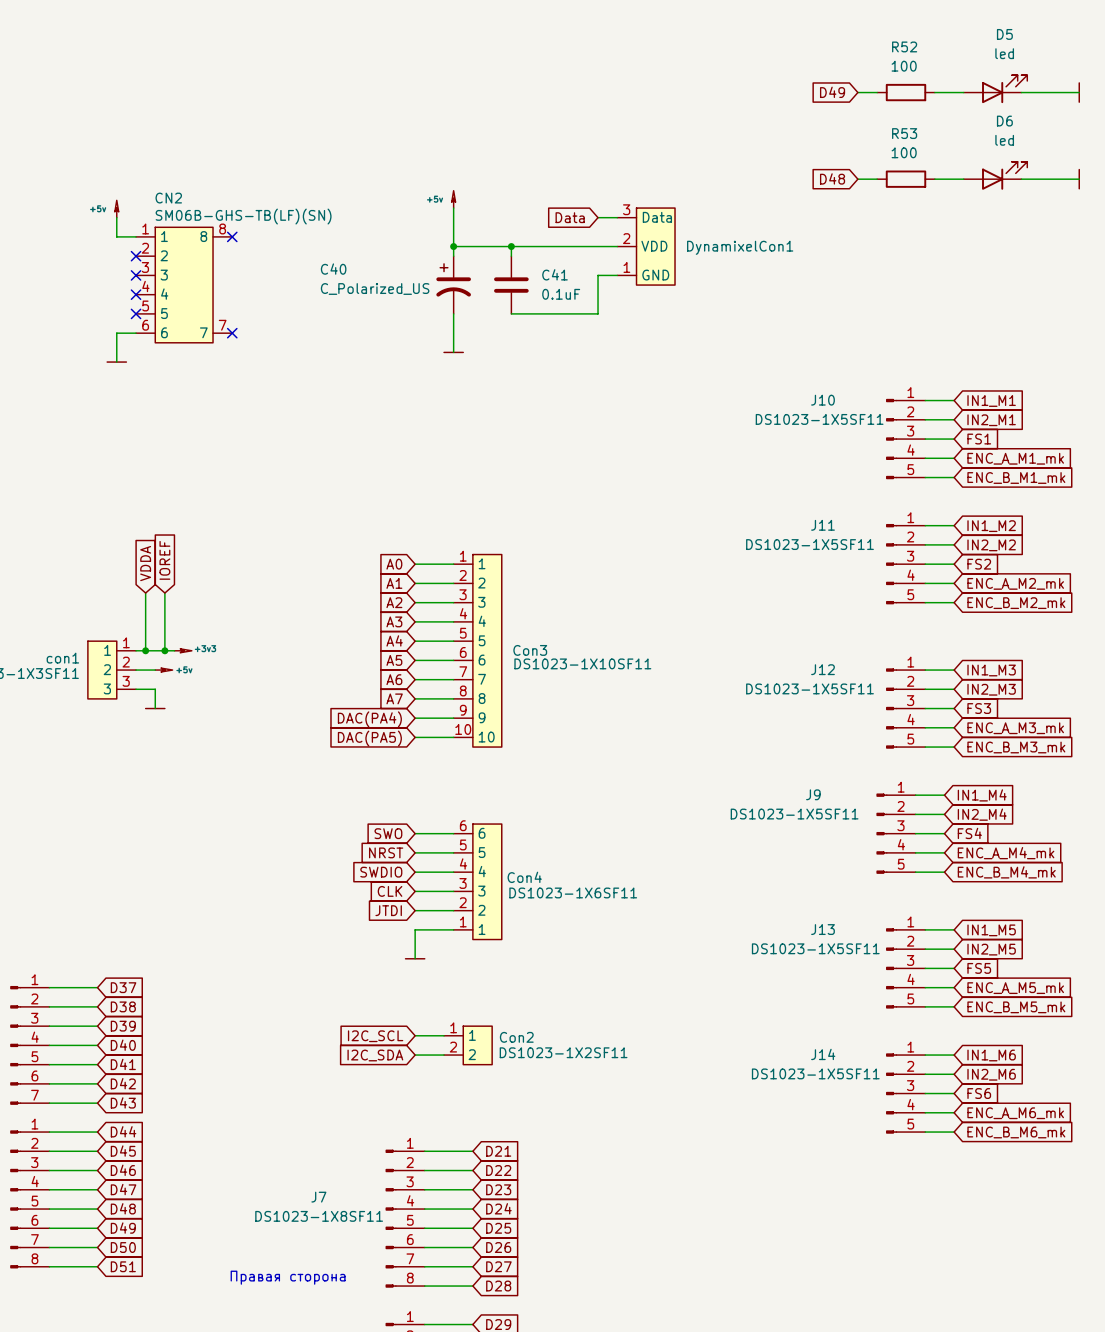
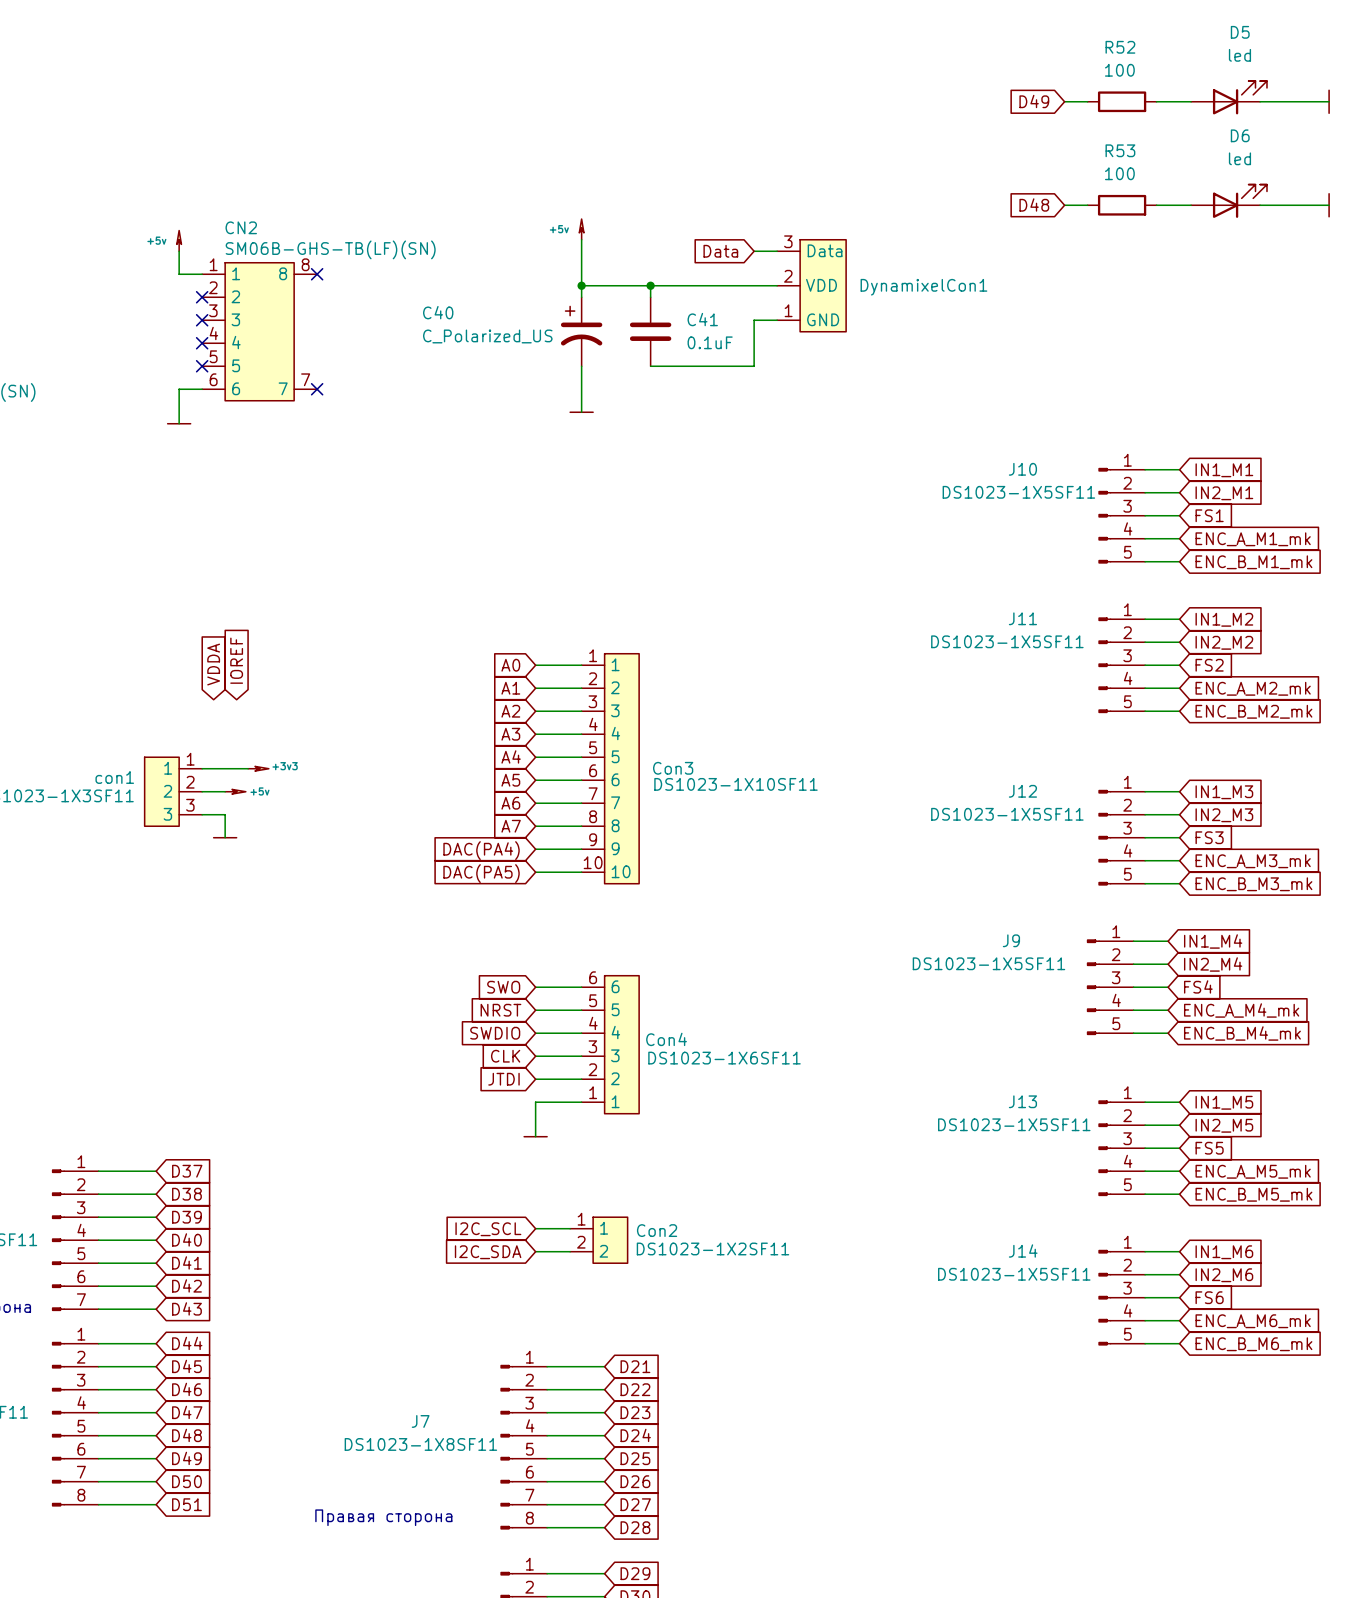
wire: (145, 593) (145, 650) -> none
wire: (164, 593) (164, 650) -> none
junction: (145, 650) -> none
junction: (164, 650) -> none

